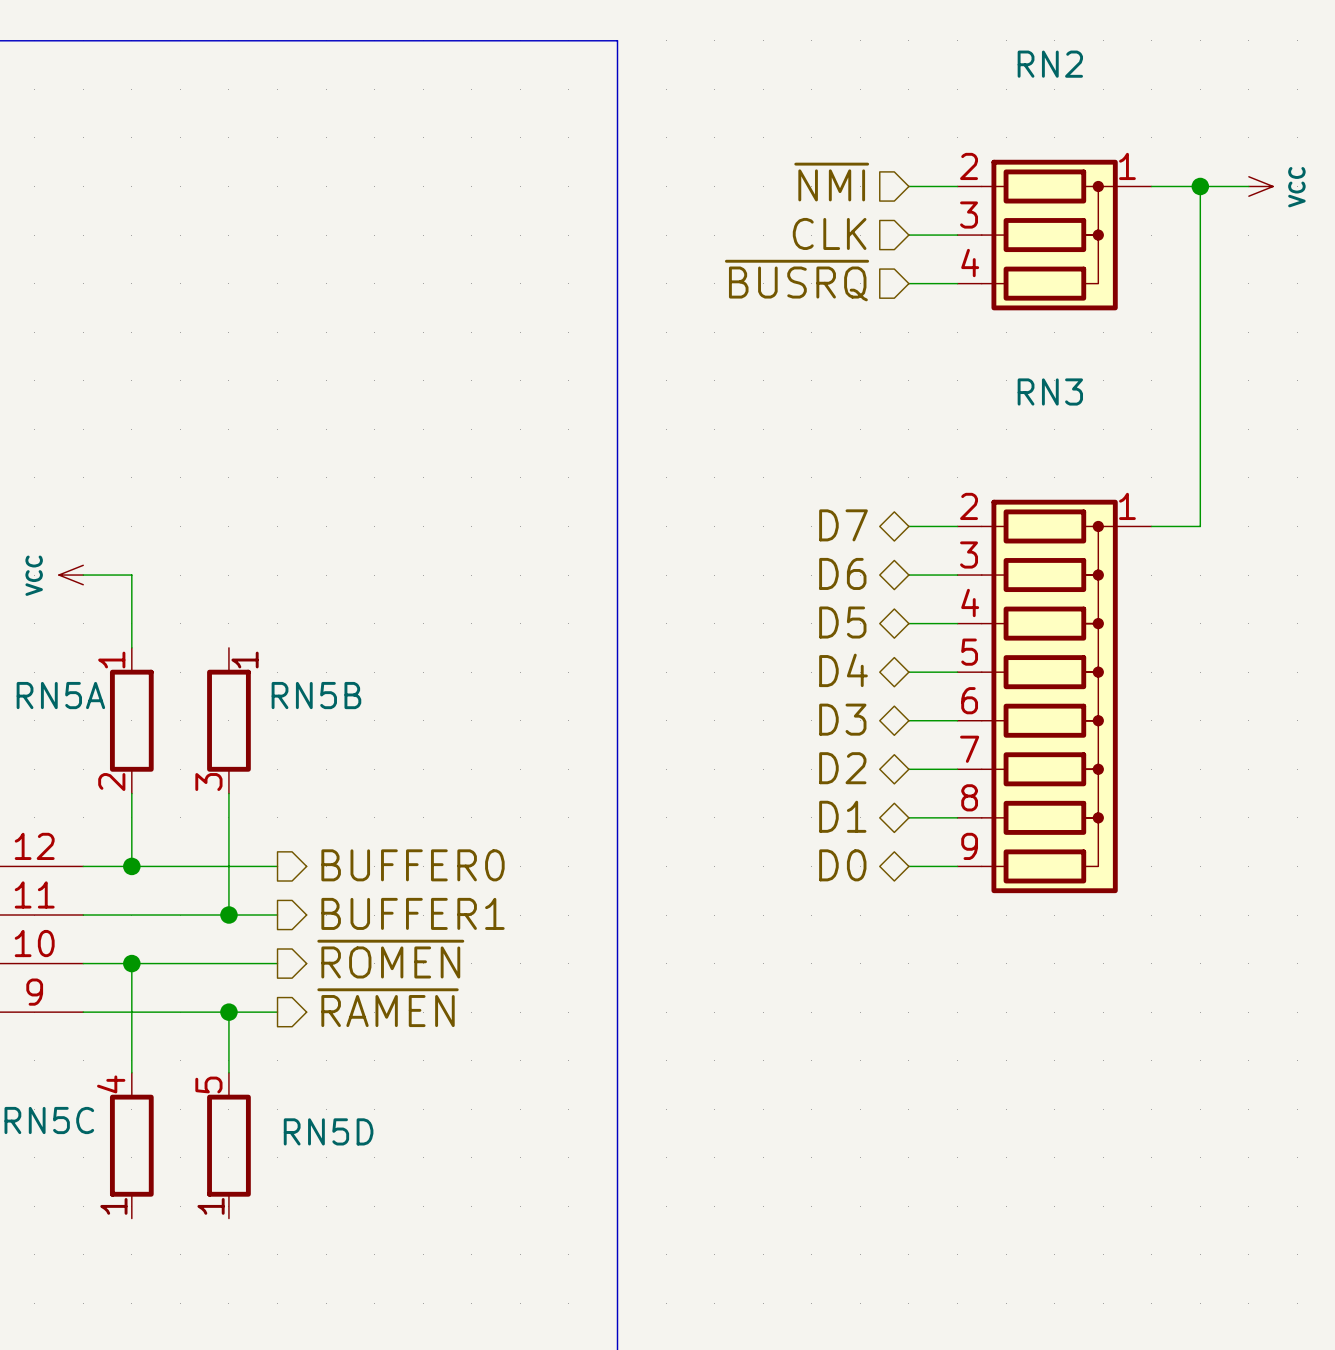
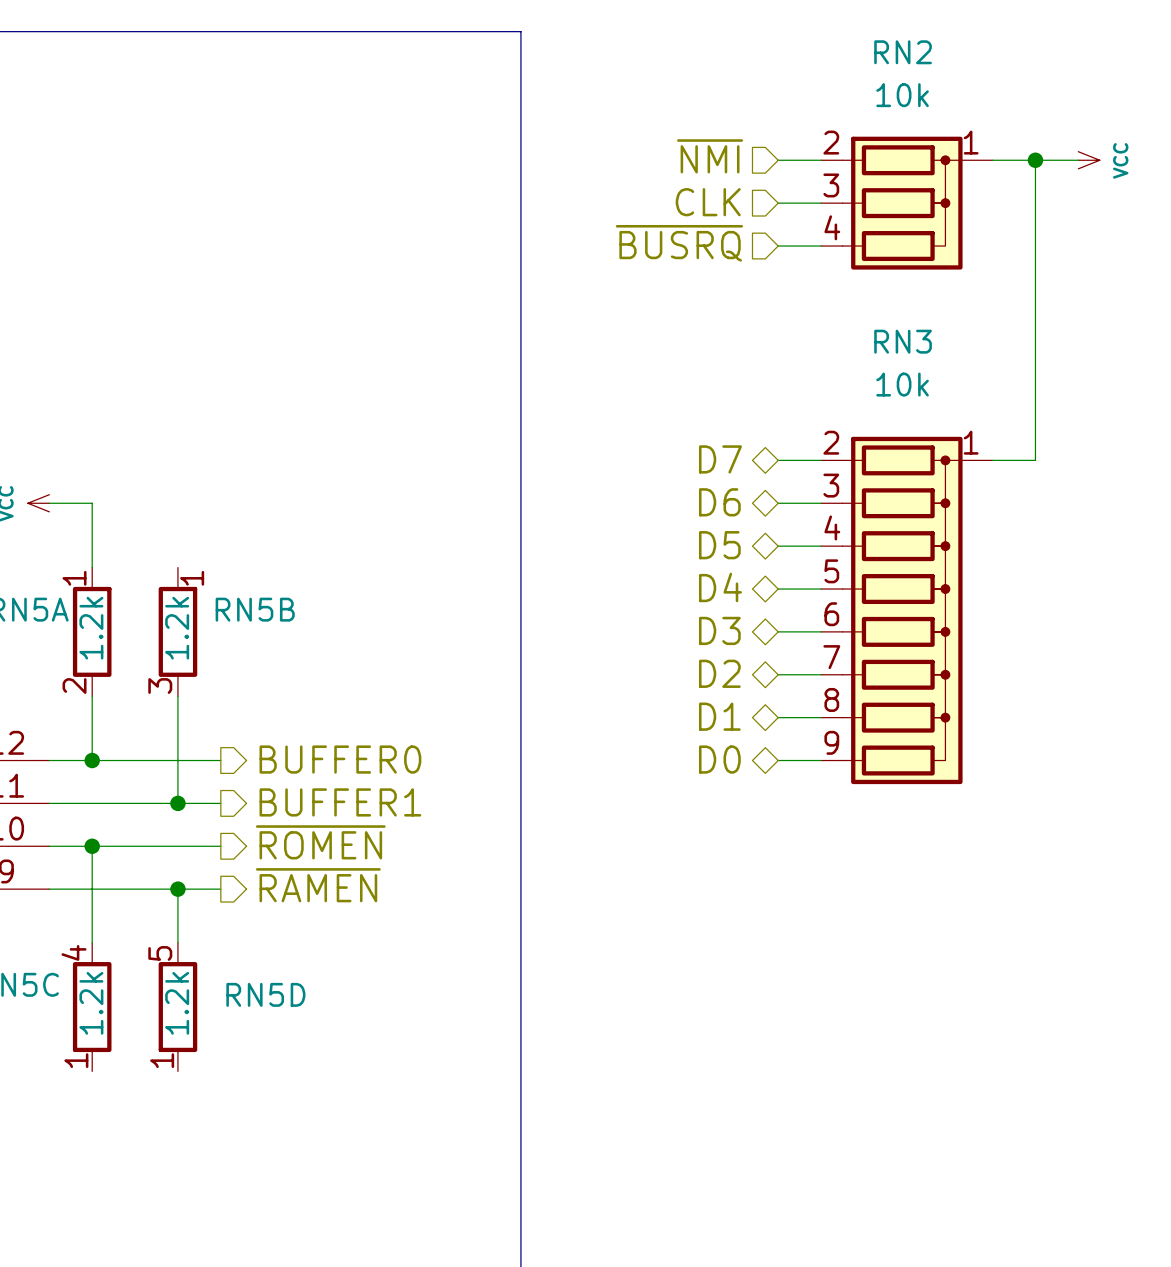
RN2 value: none -> 10k (902, 95)
RN3 value: none -> 10k (902, 384)
RN5A value: none -> 1.2k (91, 628)
RN5B value: none -> 1.2k (177, 628)
RN5C value: none -> 1.2k (91, 1003)
RN5D value: none -> 1.2k (177, 1003)

